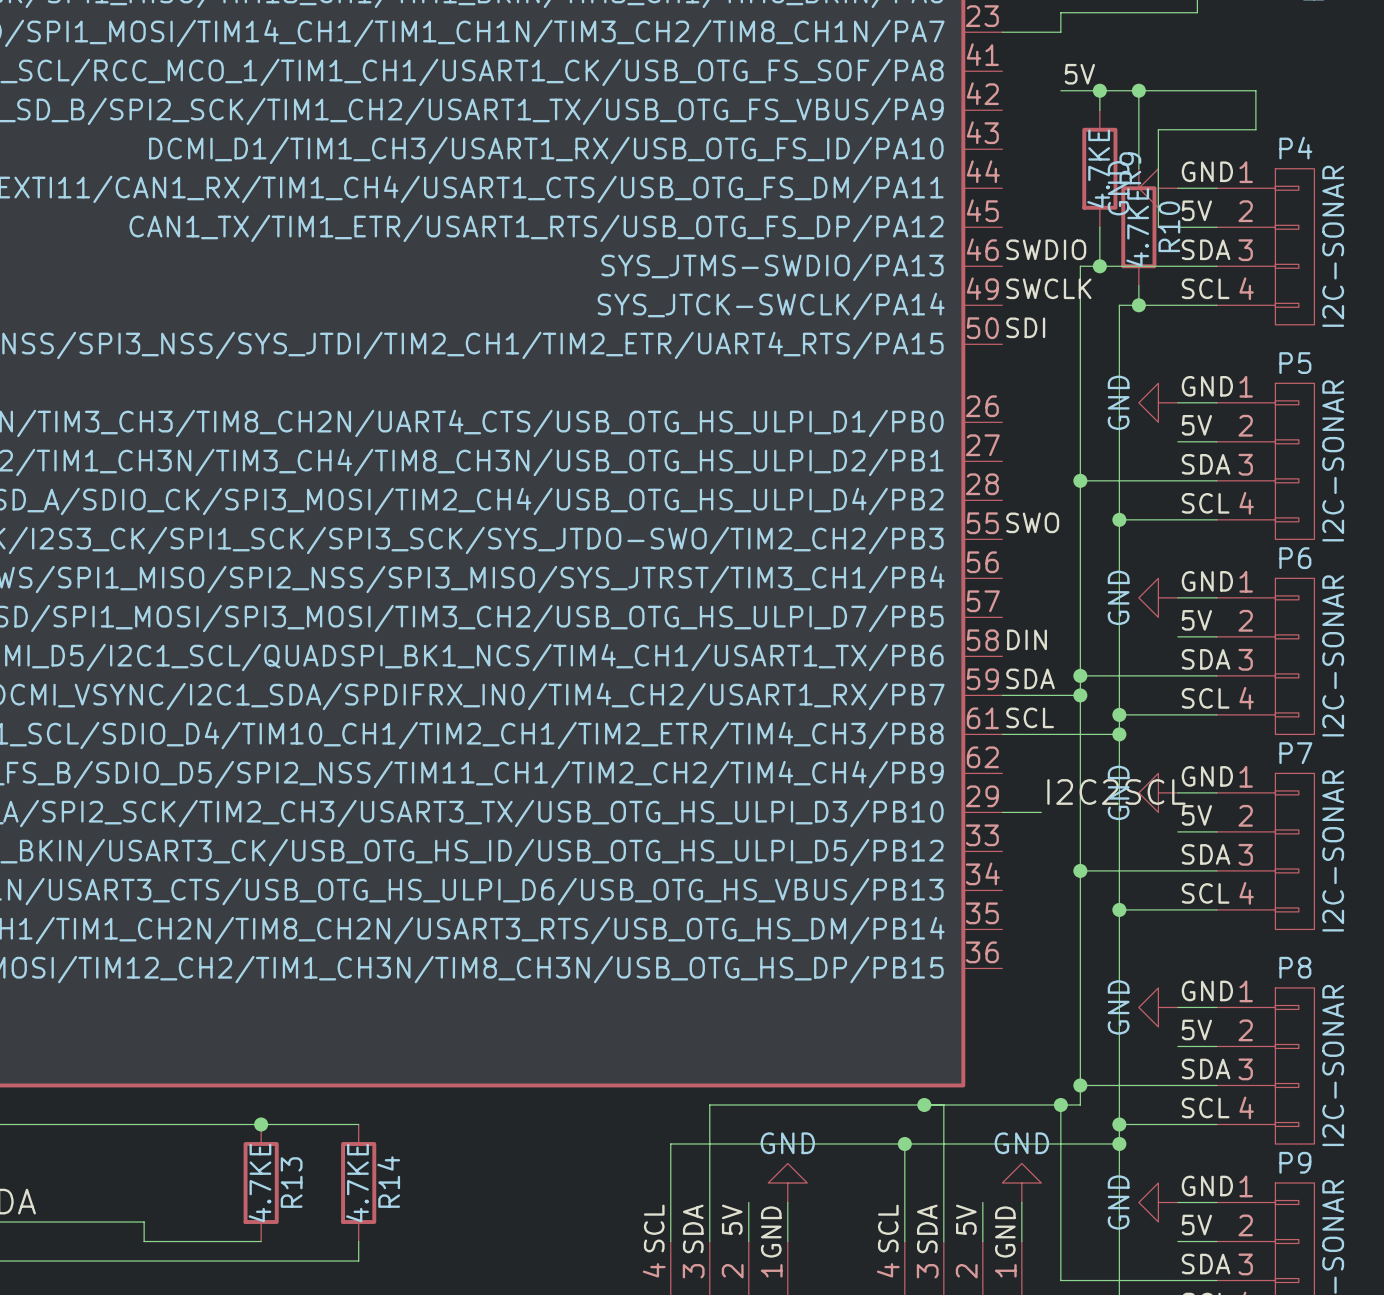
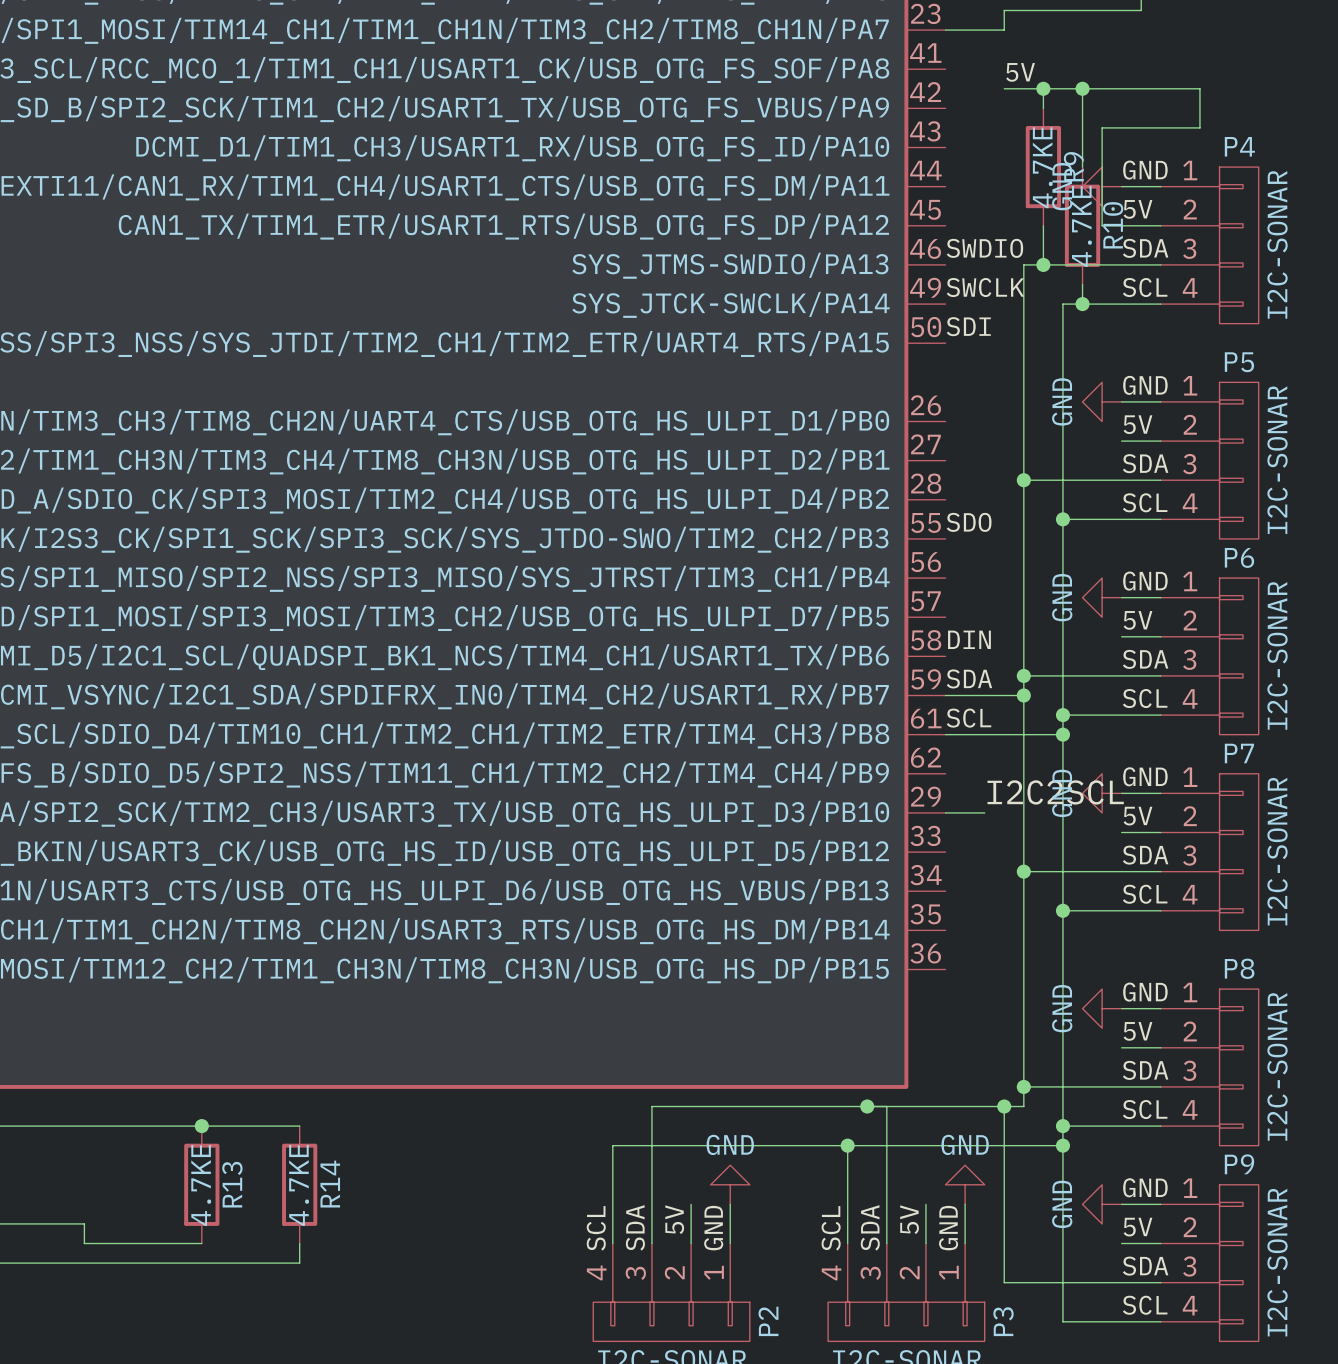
label: SWO (1032, 522) -> SDO (969, 522)

